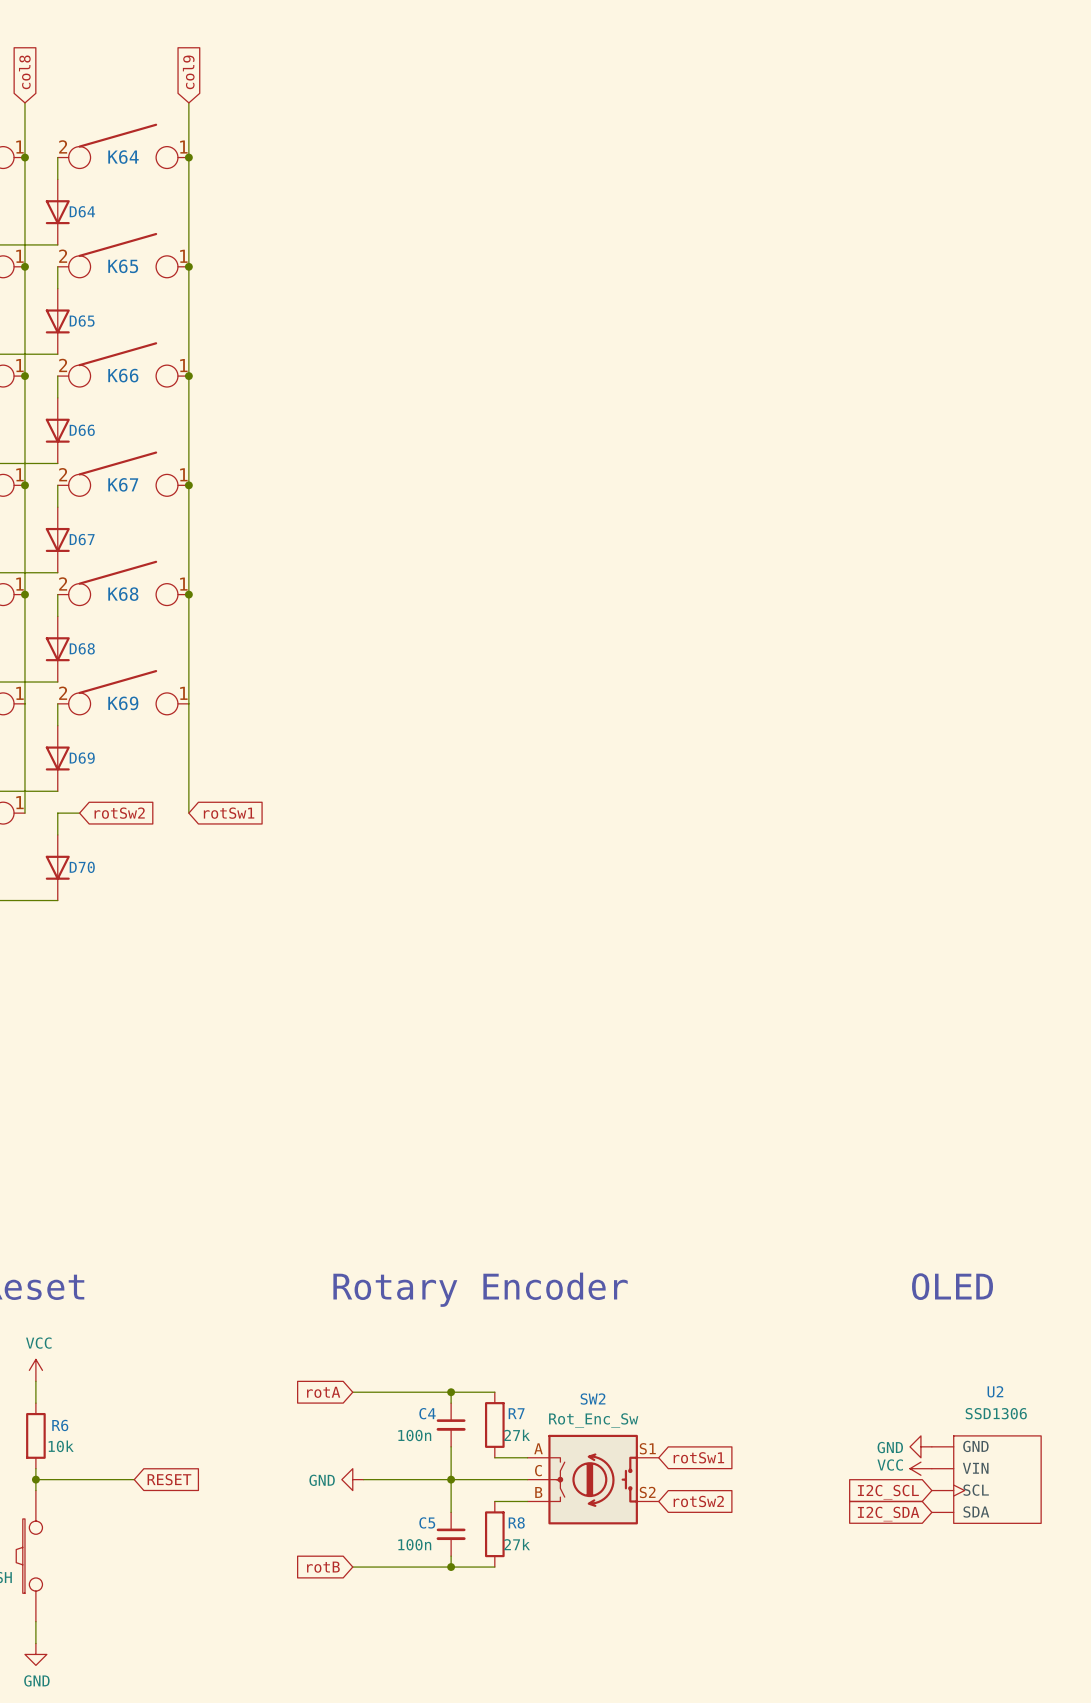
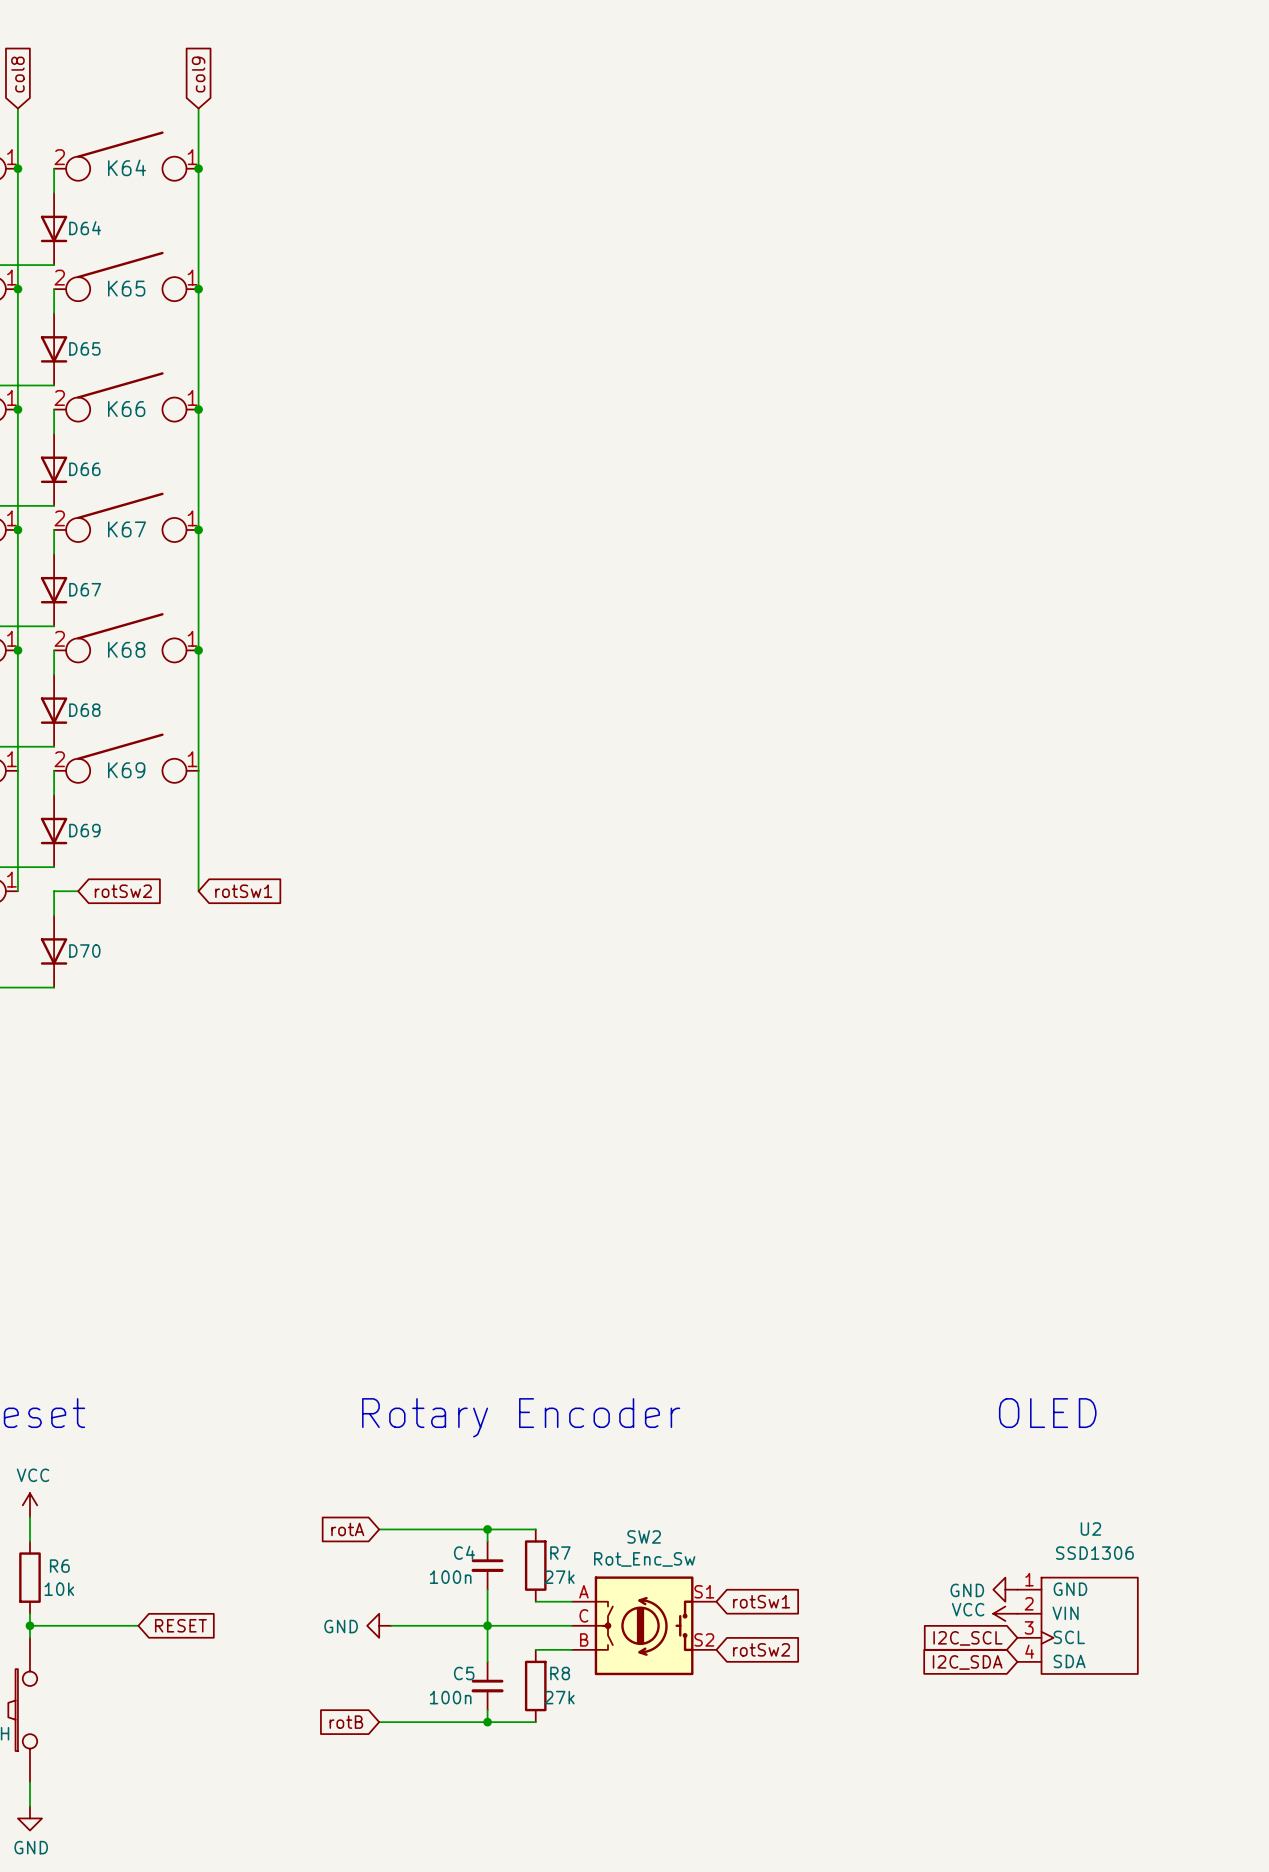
U2 pin number: none -> 1 (1029, 1579)
U2 pin number: none -> 2 (1029, 1603)
U2 pin number: none -> 3 (1029, 1627)
U2 pin number: none -> 4 (1029, 1651)

